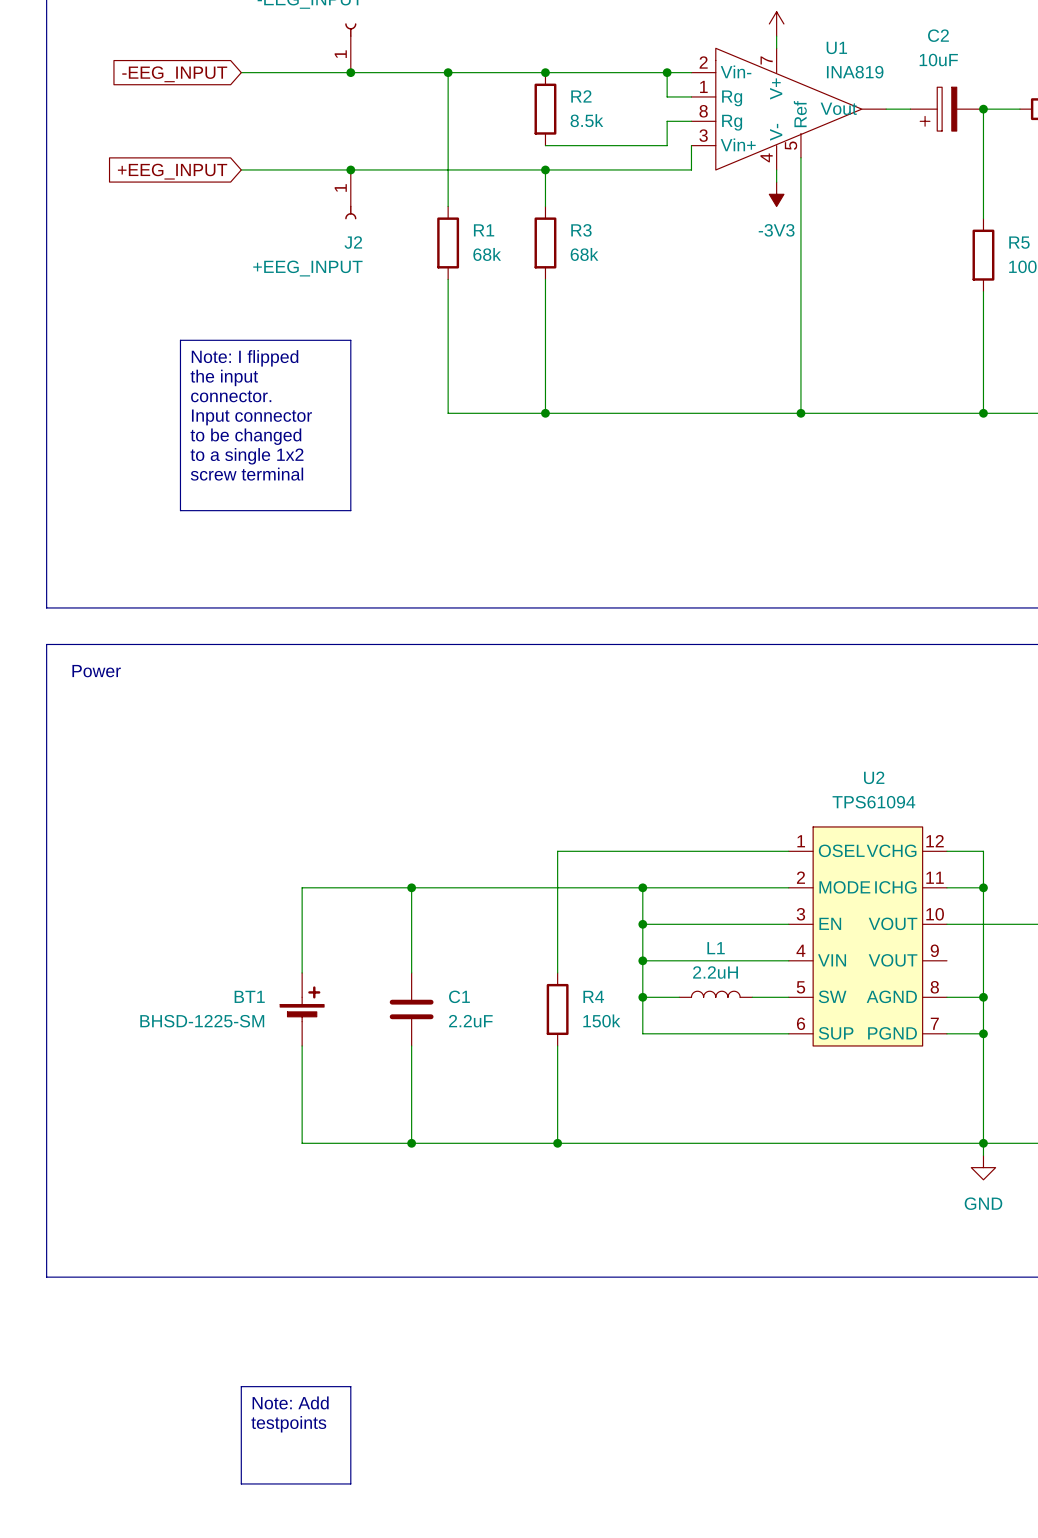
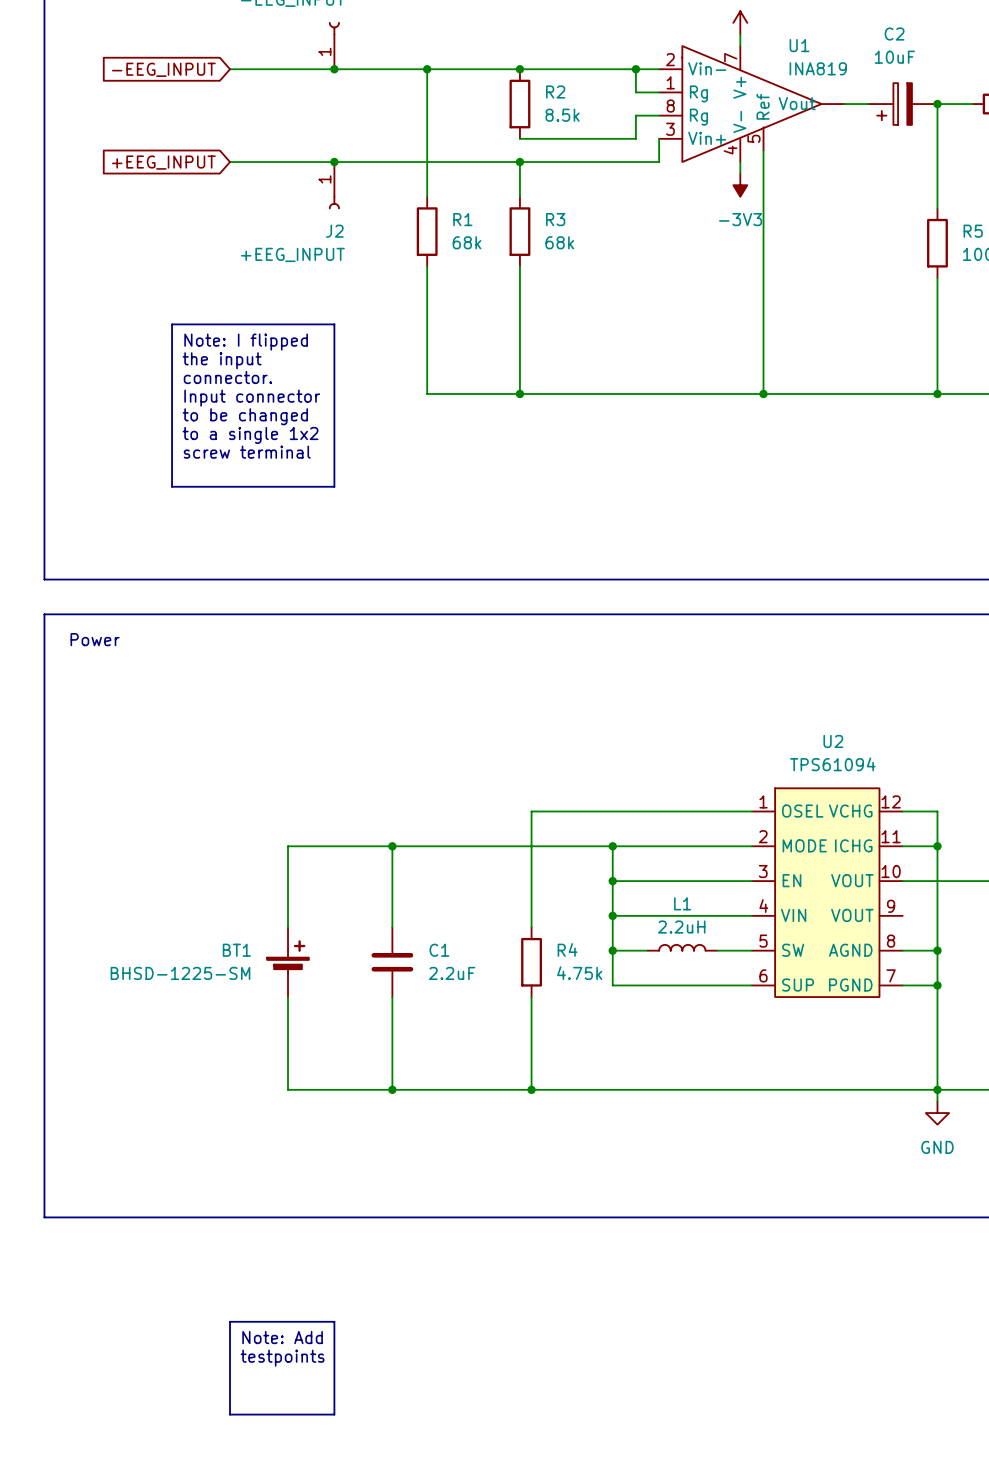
R4 value: 150k (601, 1020) -> 4.75k (579, 973)

